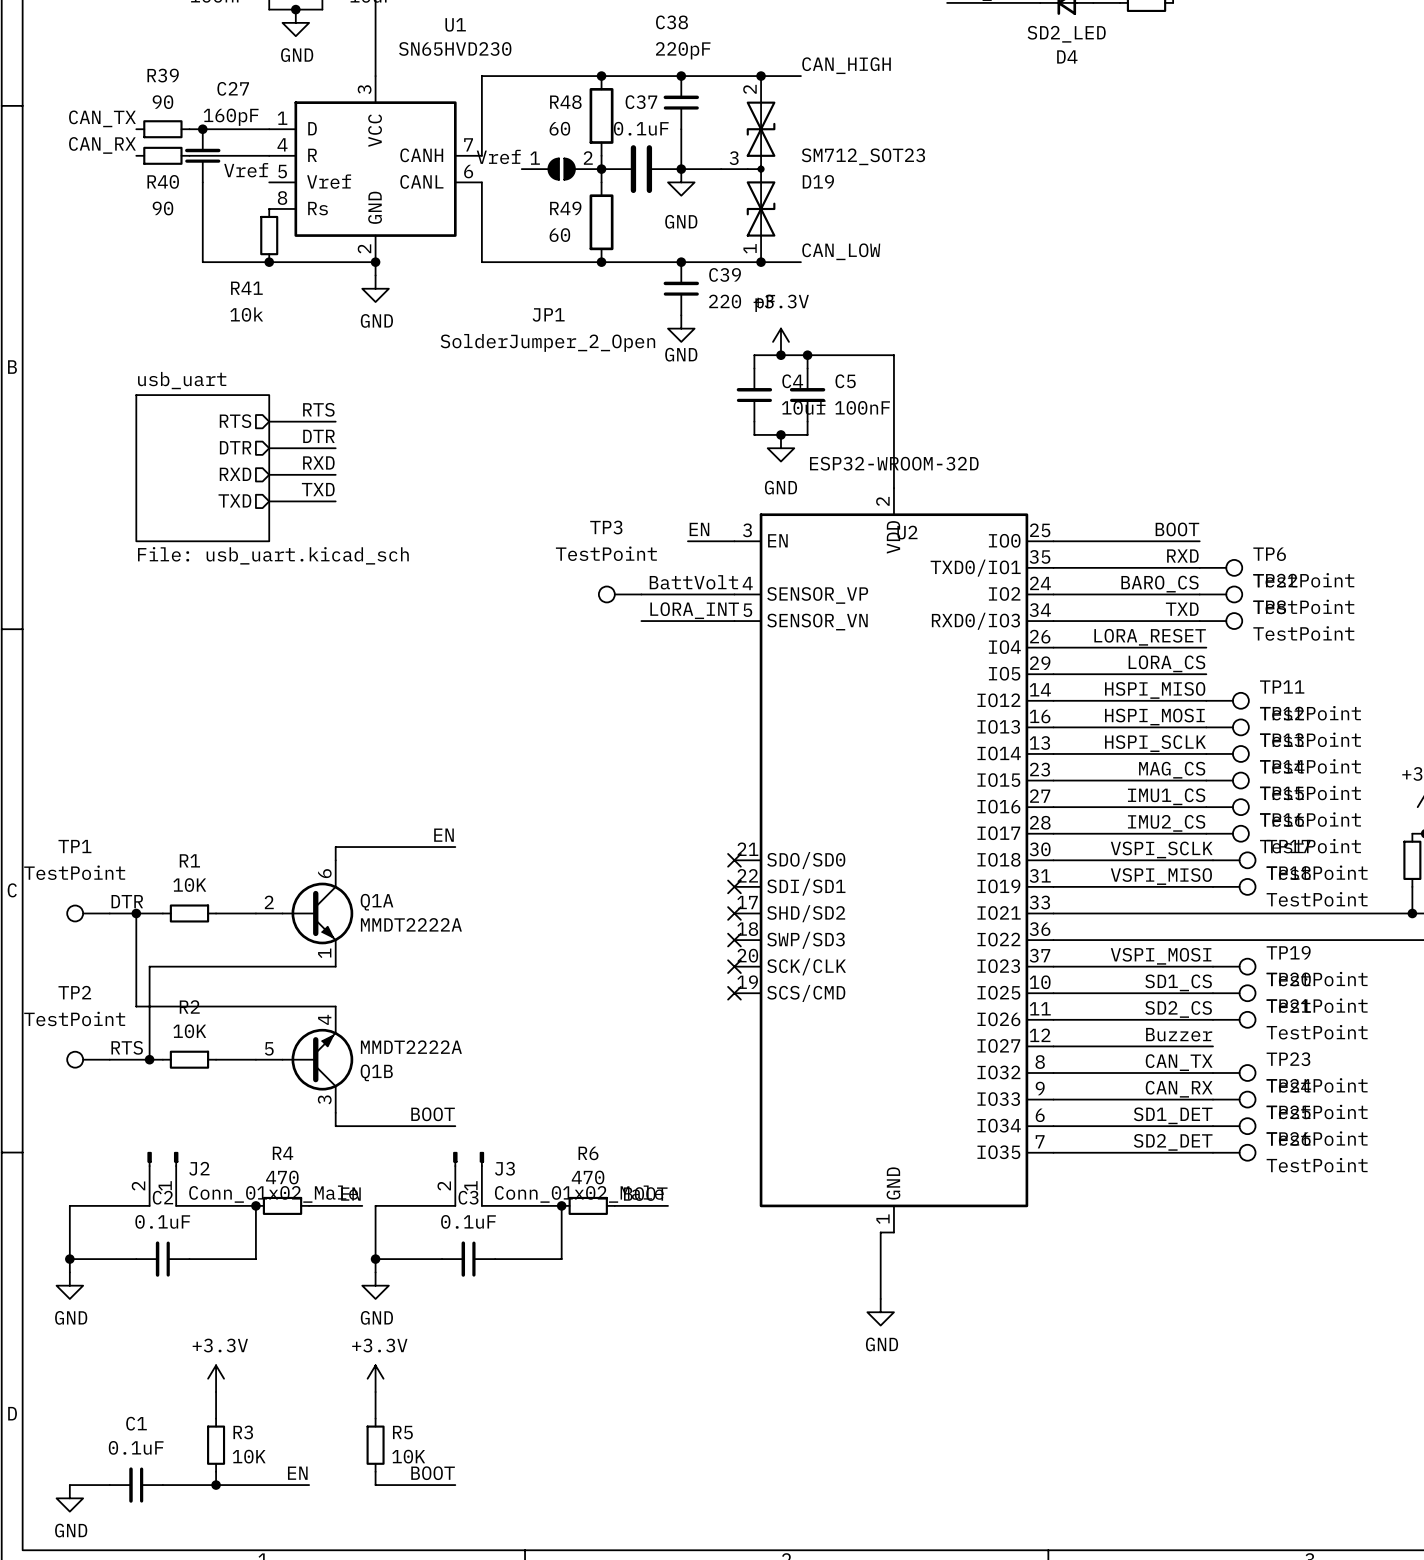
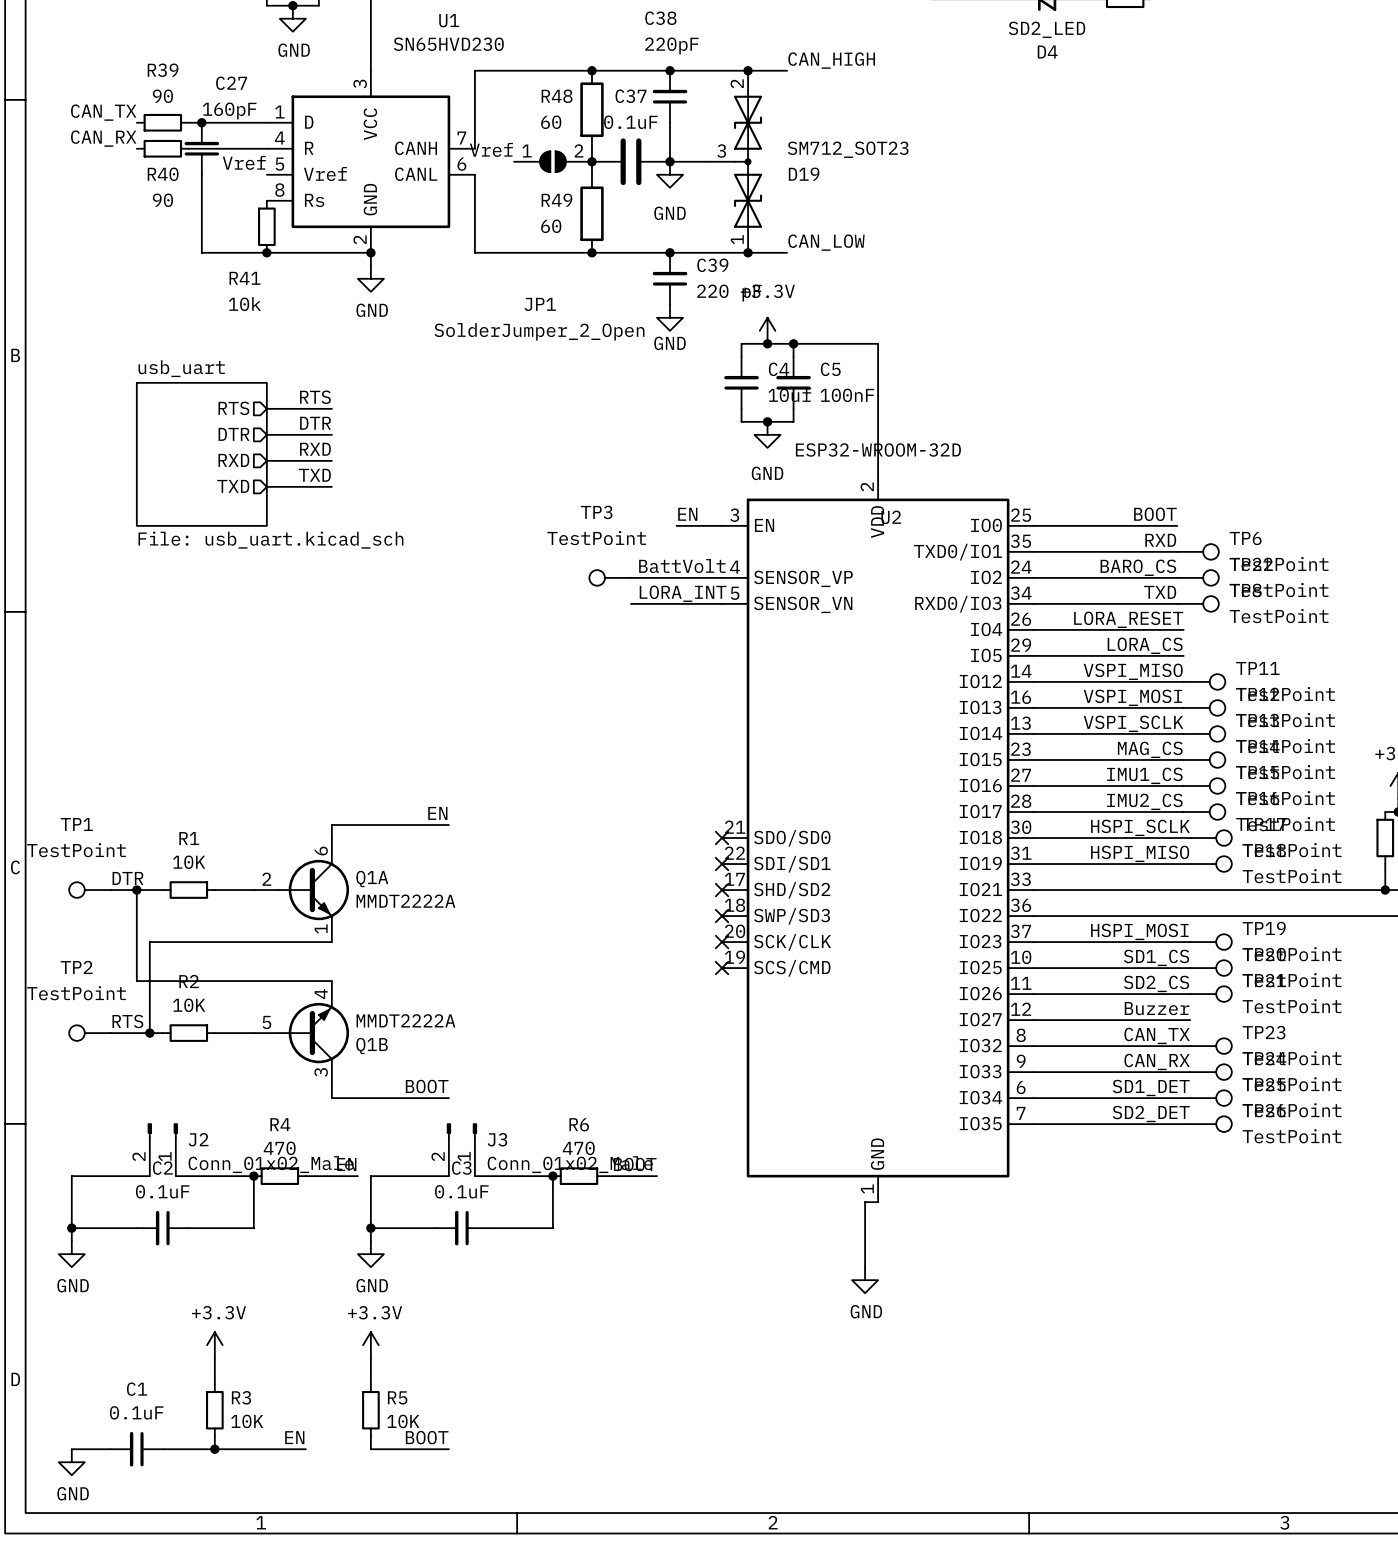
label: HSPI_MISO (1155, 690) -> VSPI_MISO (1133, 671)
label: HSPI_MOSI (1154, 717) -> VSPI_MOSI (1132, 697)
label: HSPI_SCLK (1155, 743) -> VSPI_SCLK (1133, 723)
label: VSPI_SCLK (1161, 849) -> HSPI_SCLK (1140, 827)
label: VSPI_MISO (1161, 876) -> HSPI_MISO (1140, 853)
label: VSPI_MOSI (1161, 956) -> HSPI_MOSI (1139, 931)

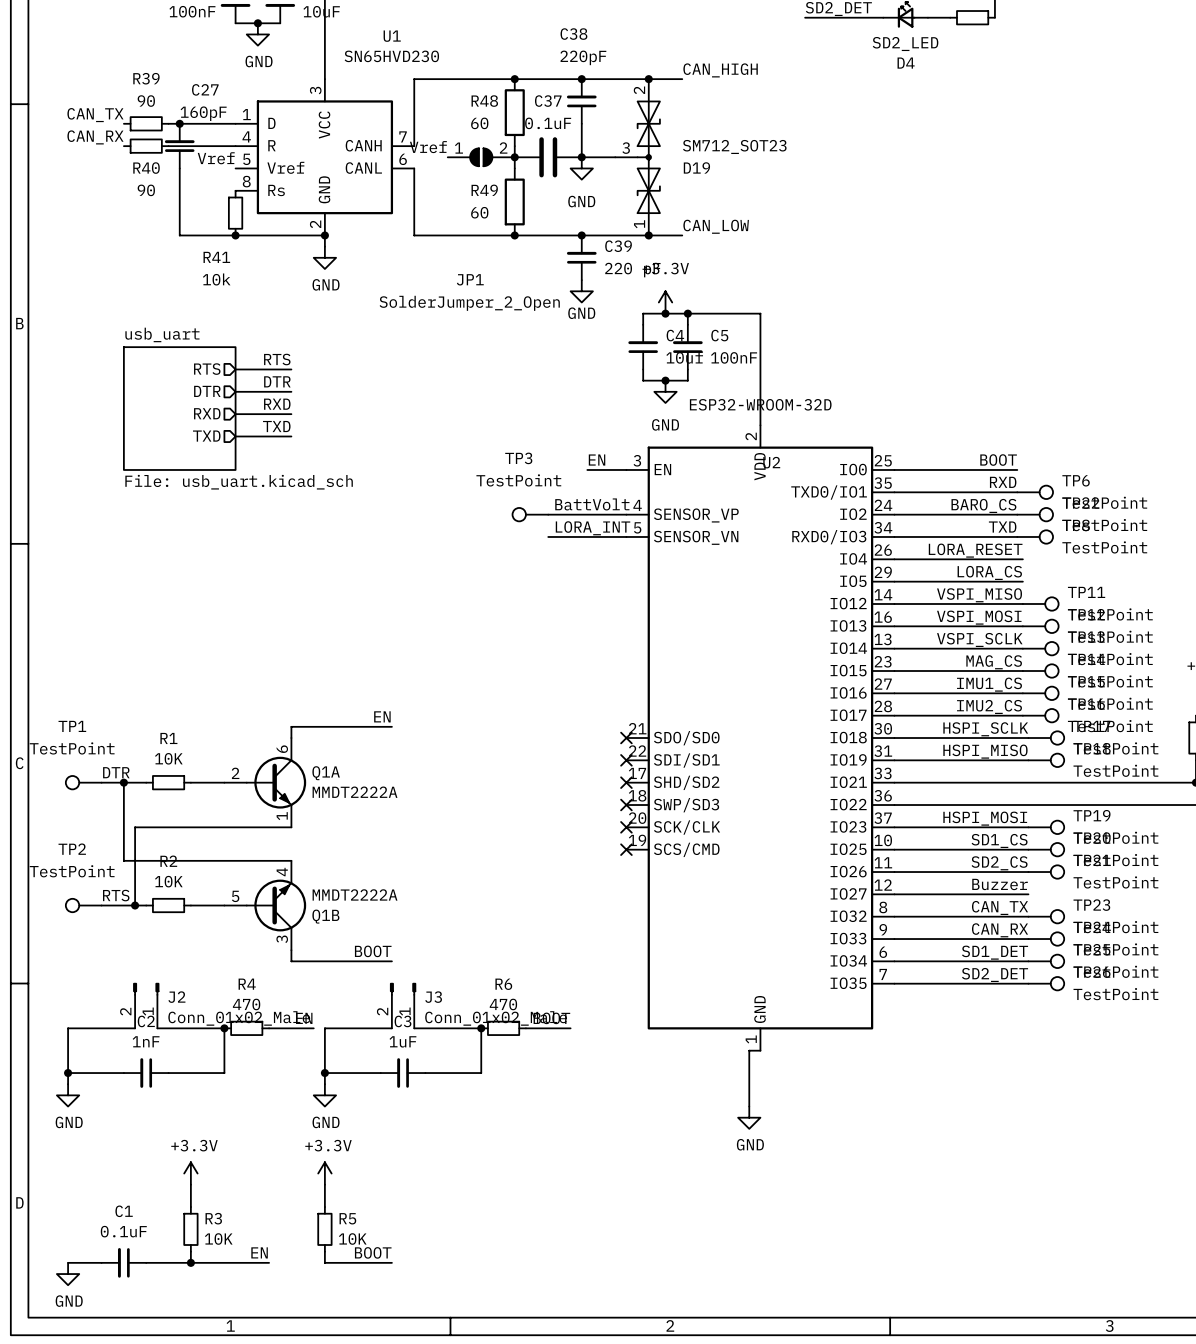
C2 value: 0.1uF (162, 1191) -> 1nF (146, 1041)
C3 value: 0.1uF (461, 1191) -> 1uF (402, 1041)

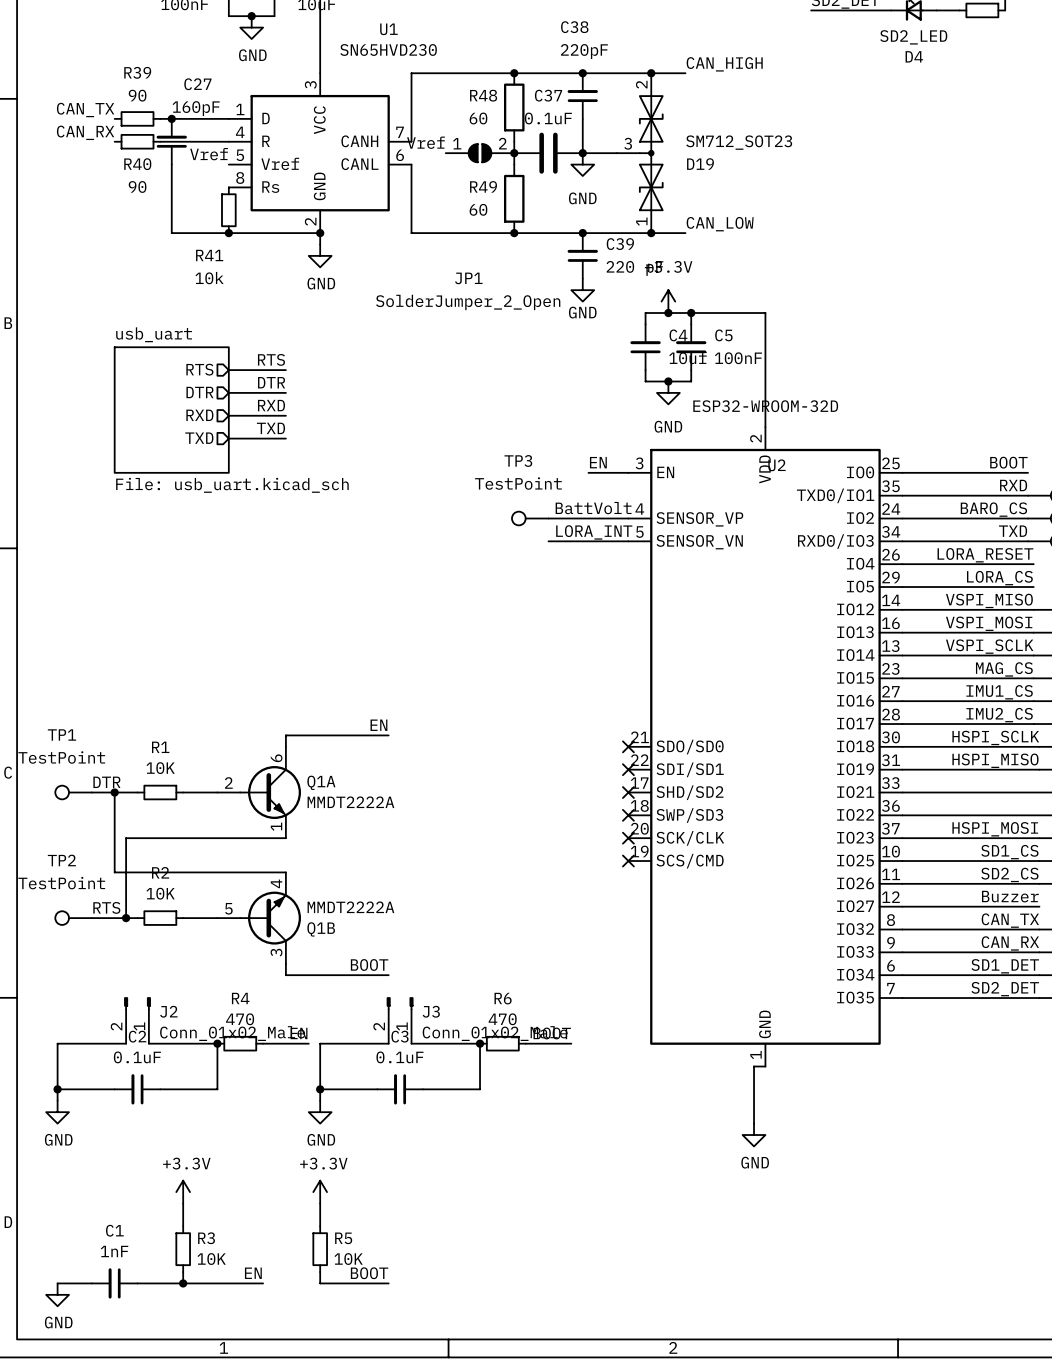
C2 value: 1nF (146, 1041) -> 0.1uF (137, 1057)
C3 value: 1uF (402, 1041) -> 0.1uF (399, 1057)
C1 value: 0.1uF (123, 1231) -> 1nF (114, 1251)

